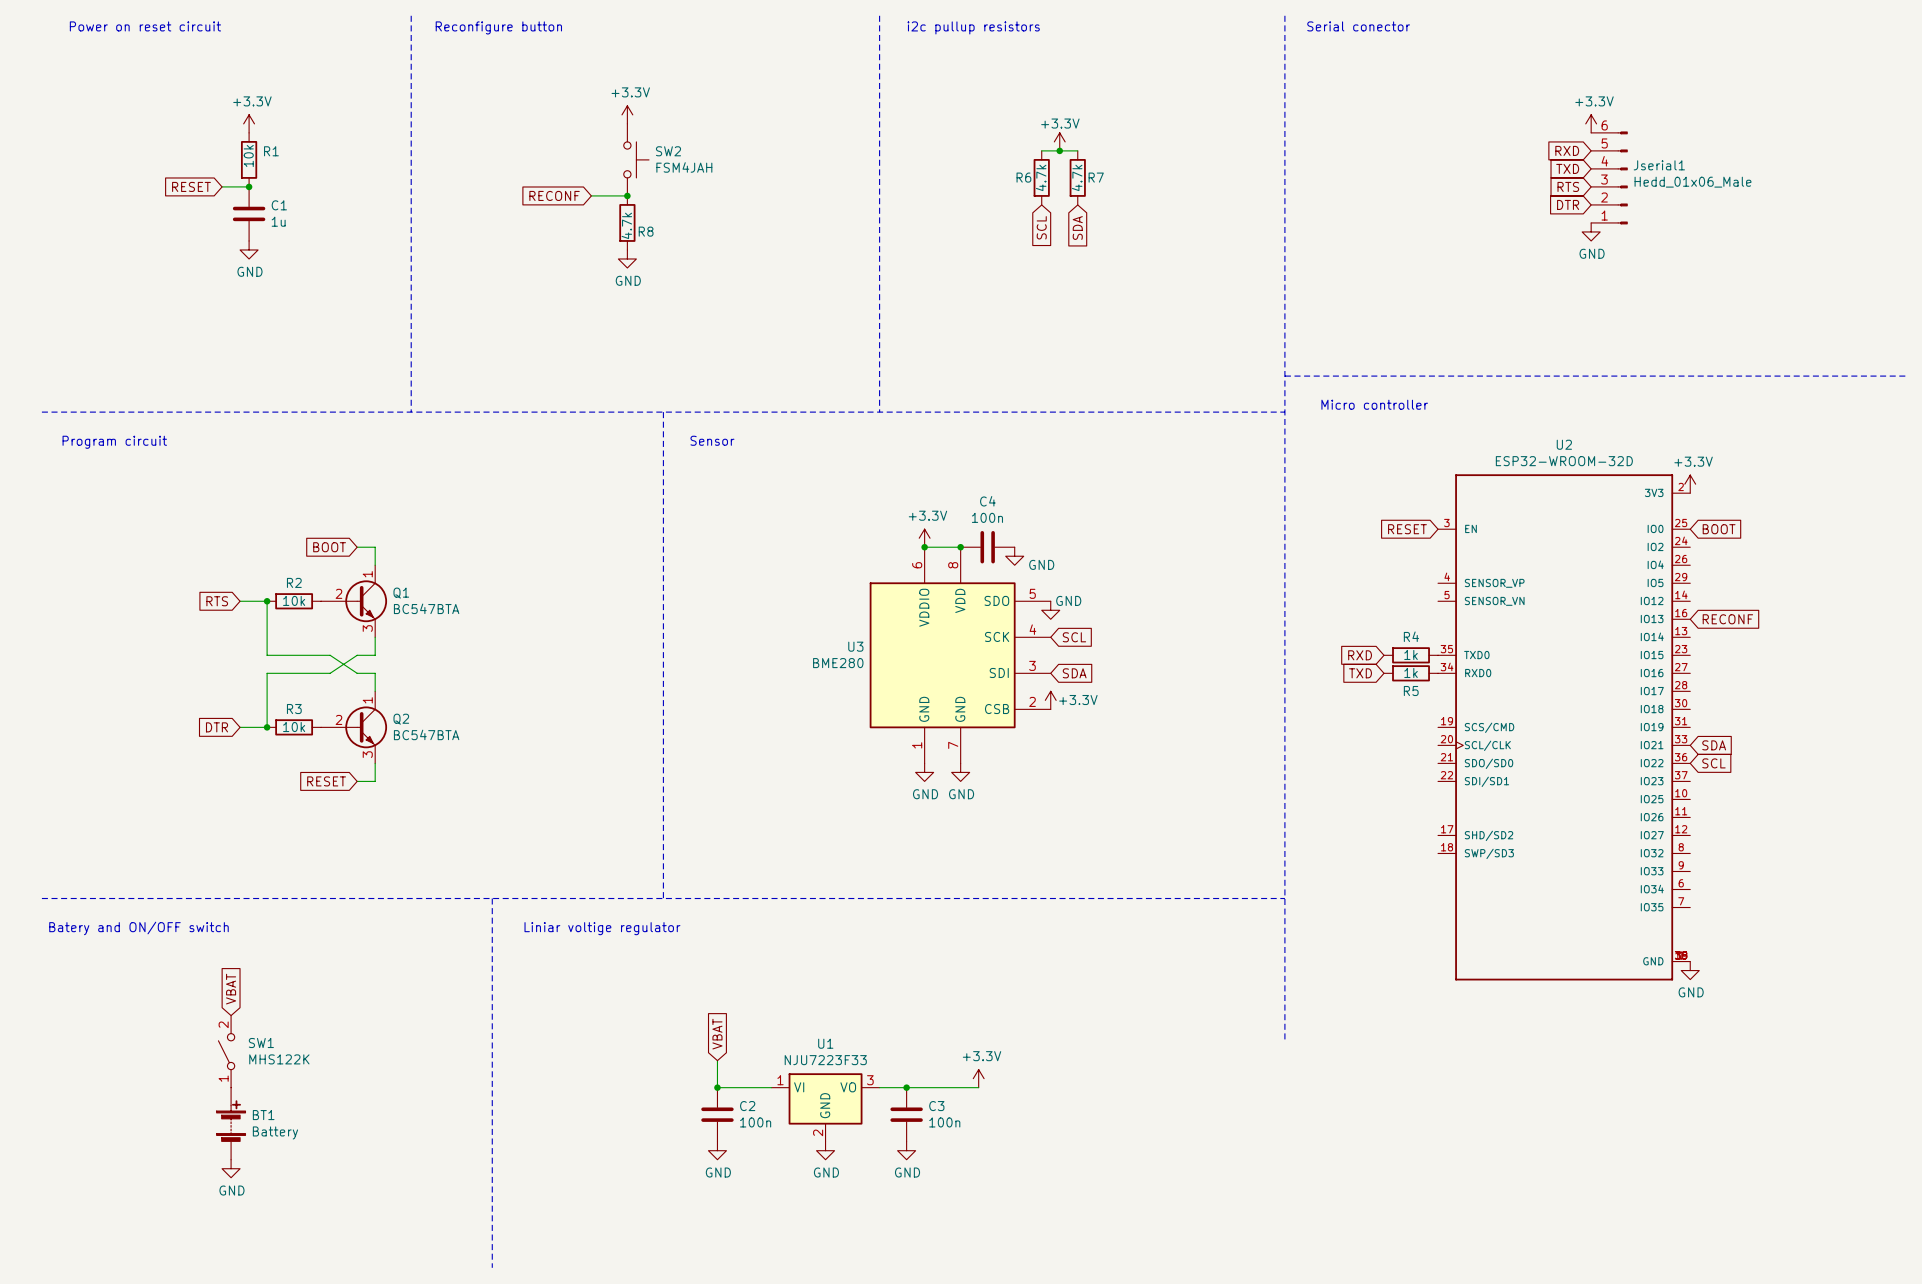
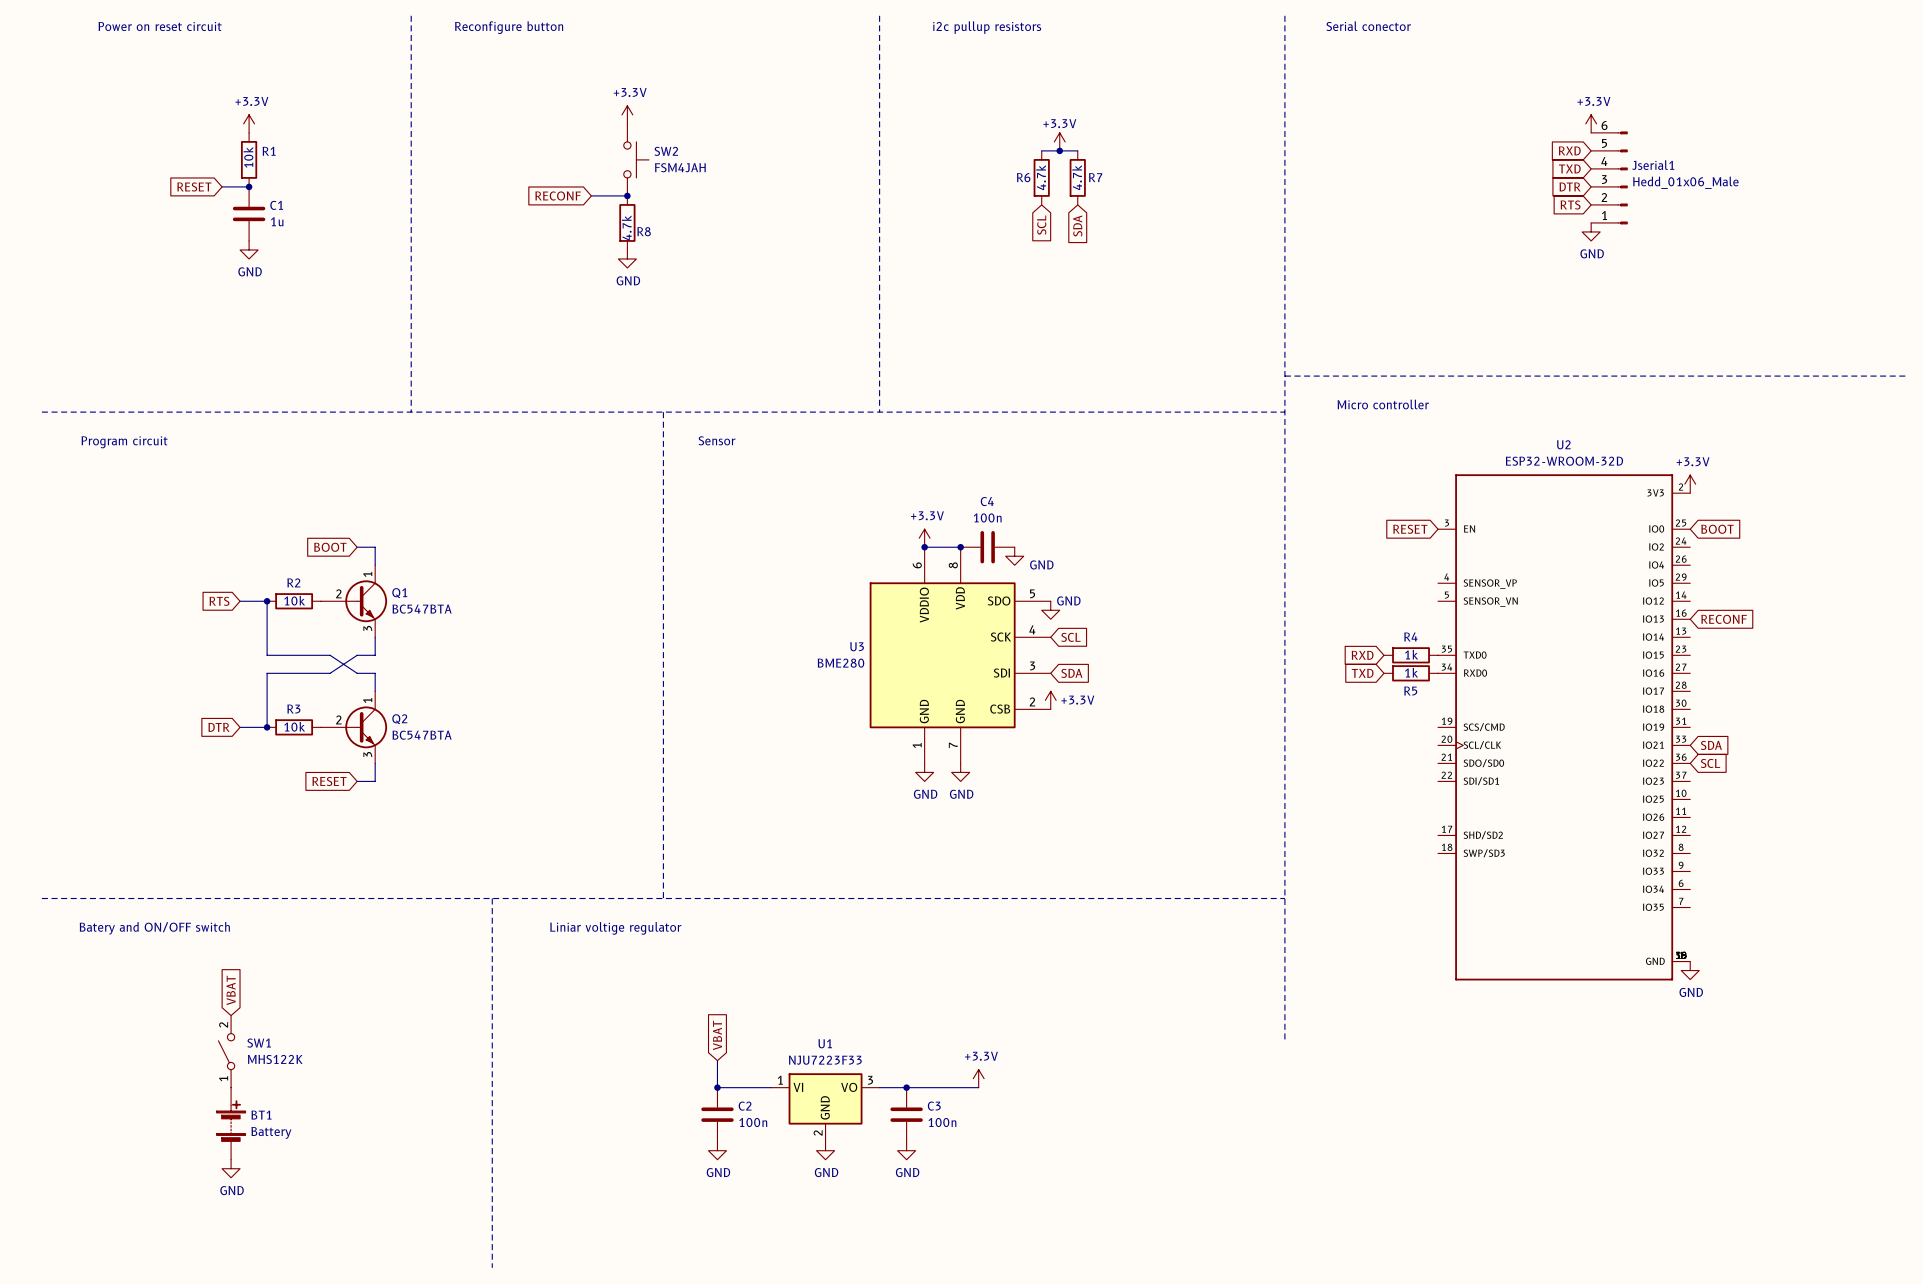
global label: RTS (1568, 186) -> DTR (1570, 186)
global label: DTR (1568, 204) -> RTS (1570, 205)

